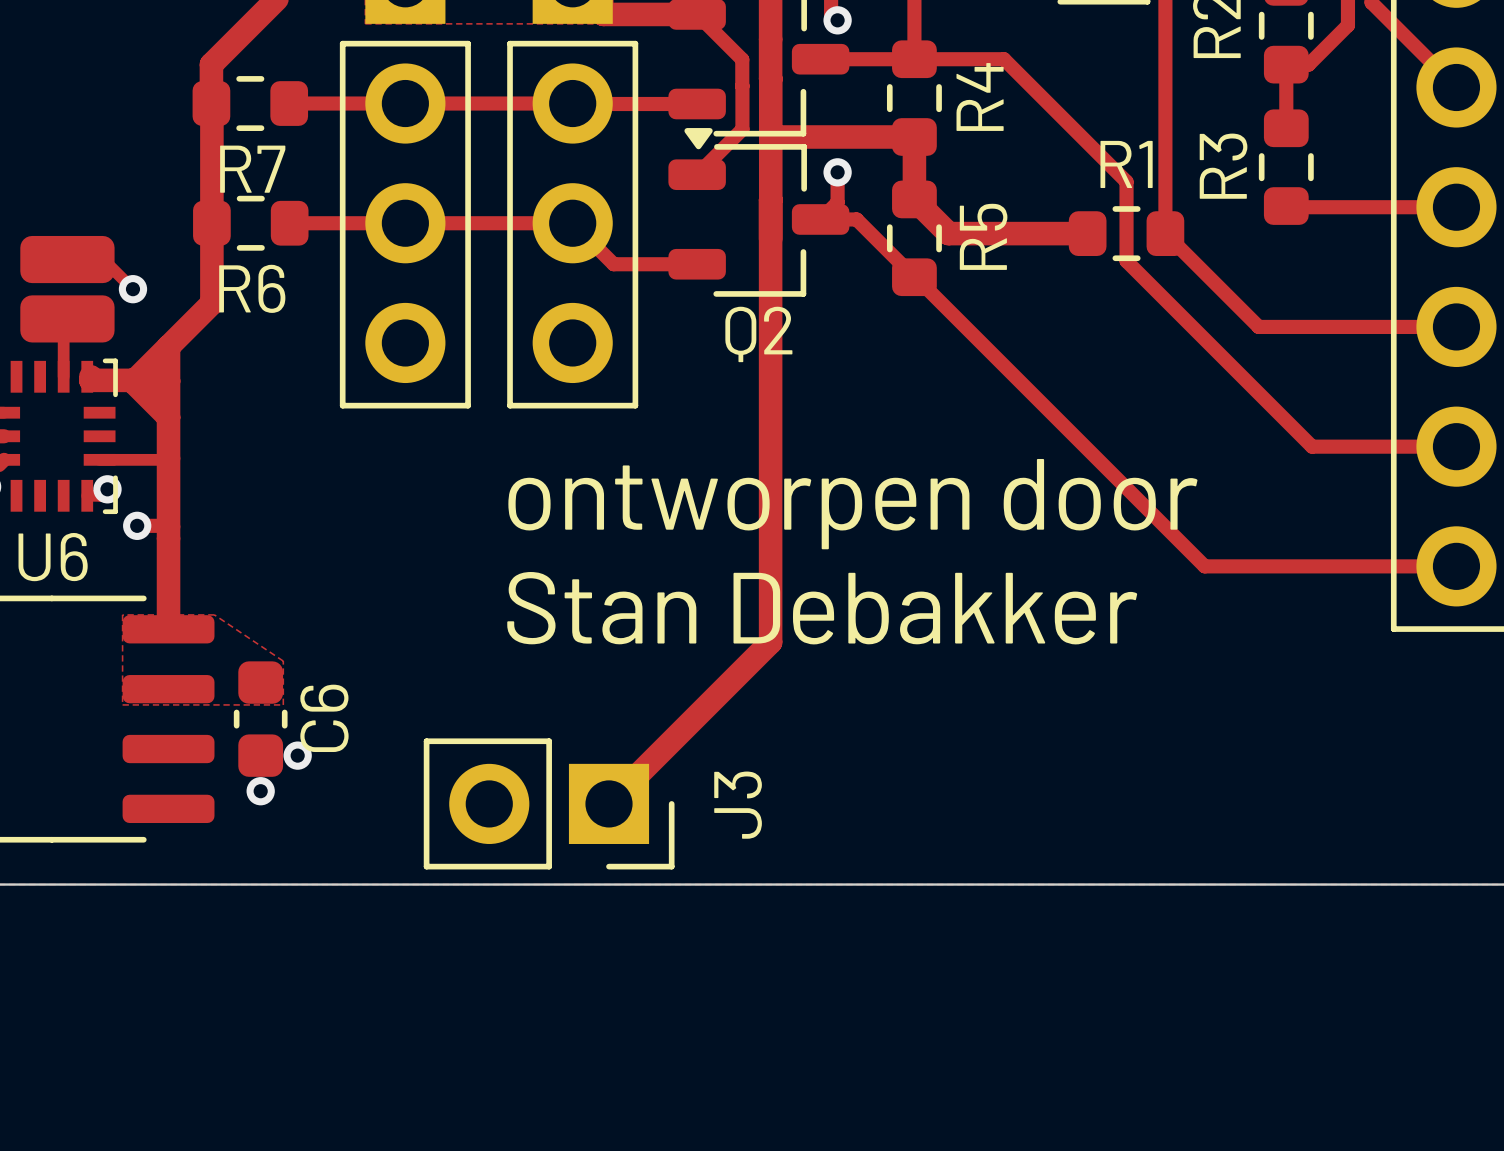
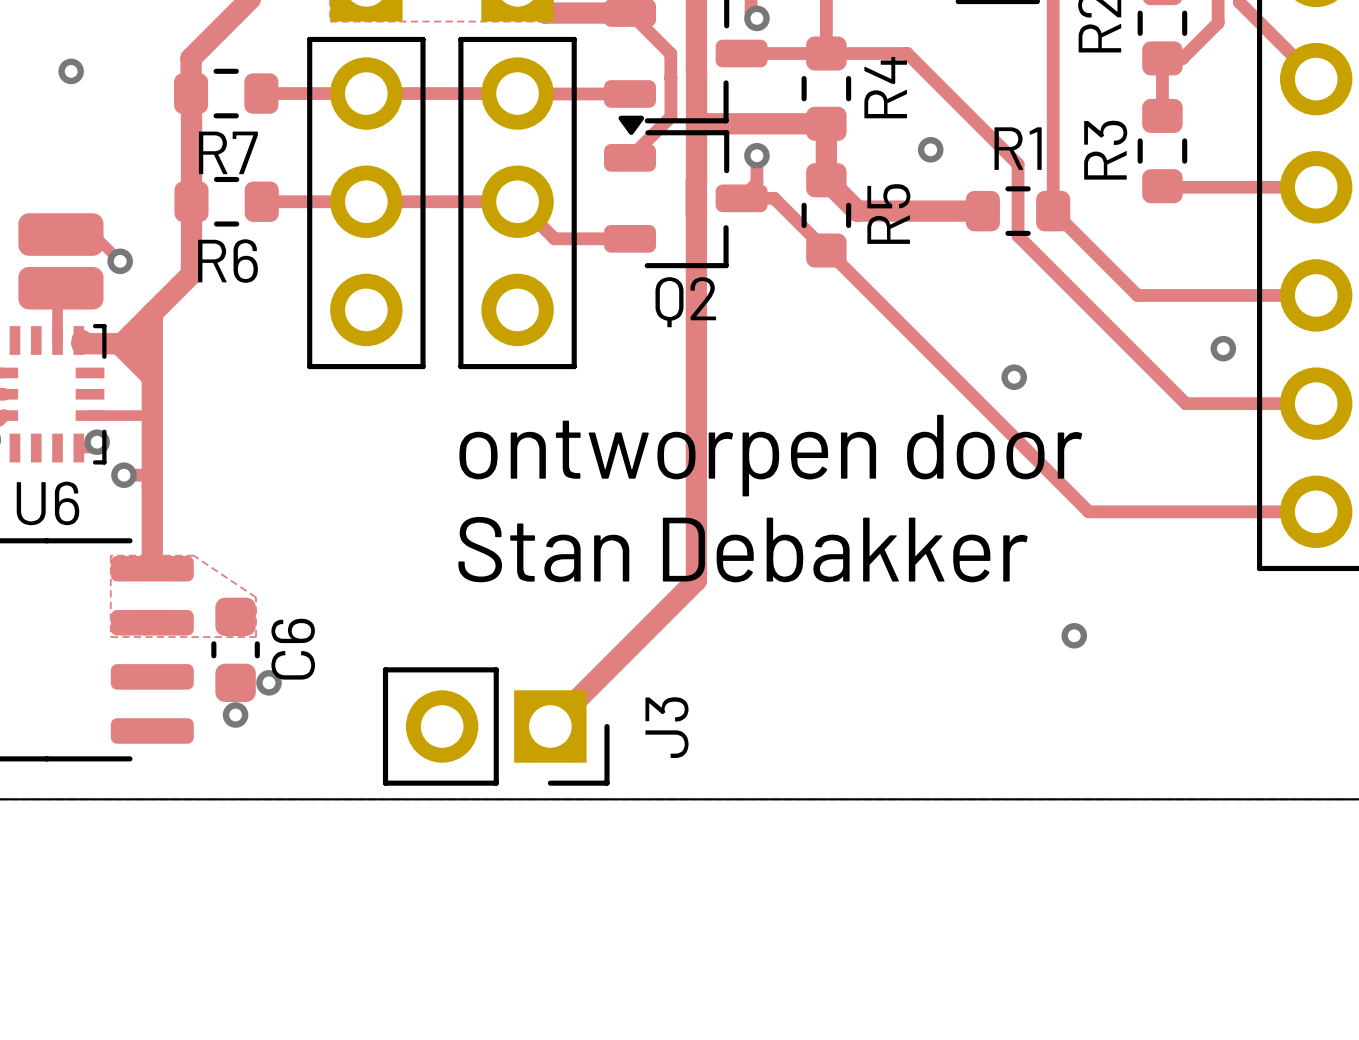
via: none -> (71, 71)
via: none -> (930, 149)
via: none -> (1223, 348)
via: none -> (1014, 377)
via: none -> (1074, 635)

